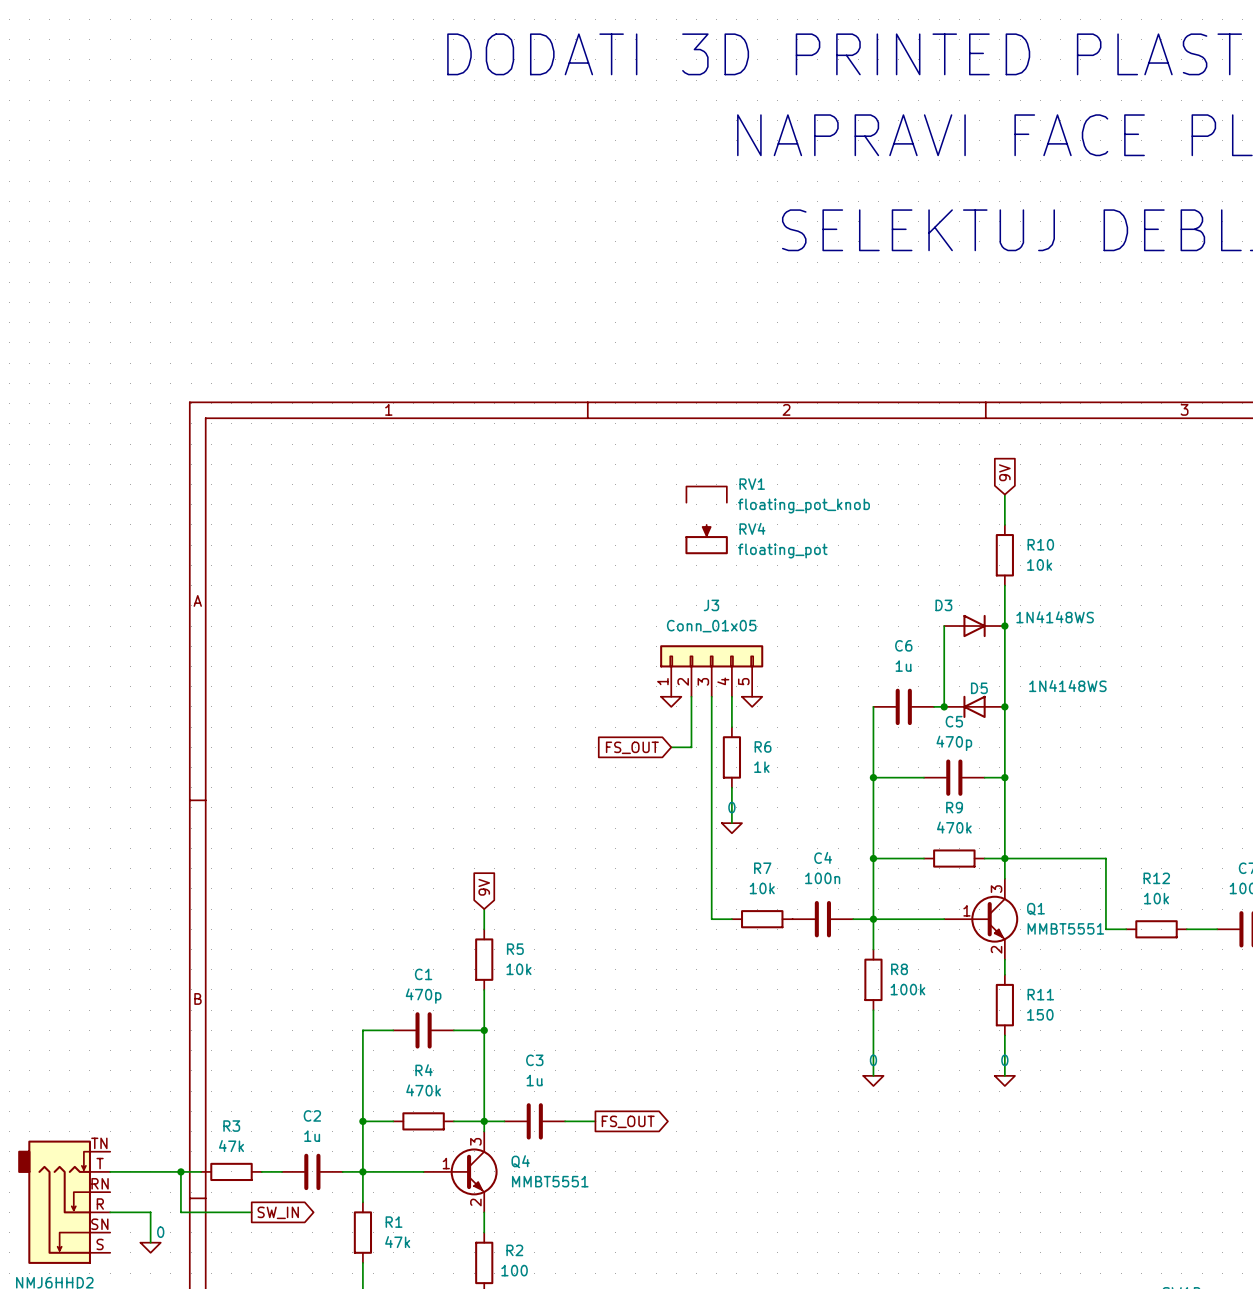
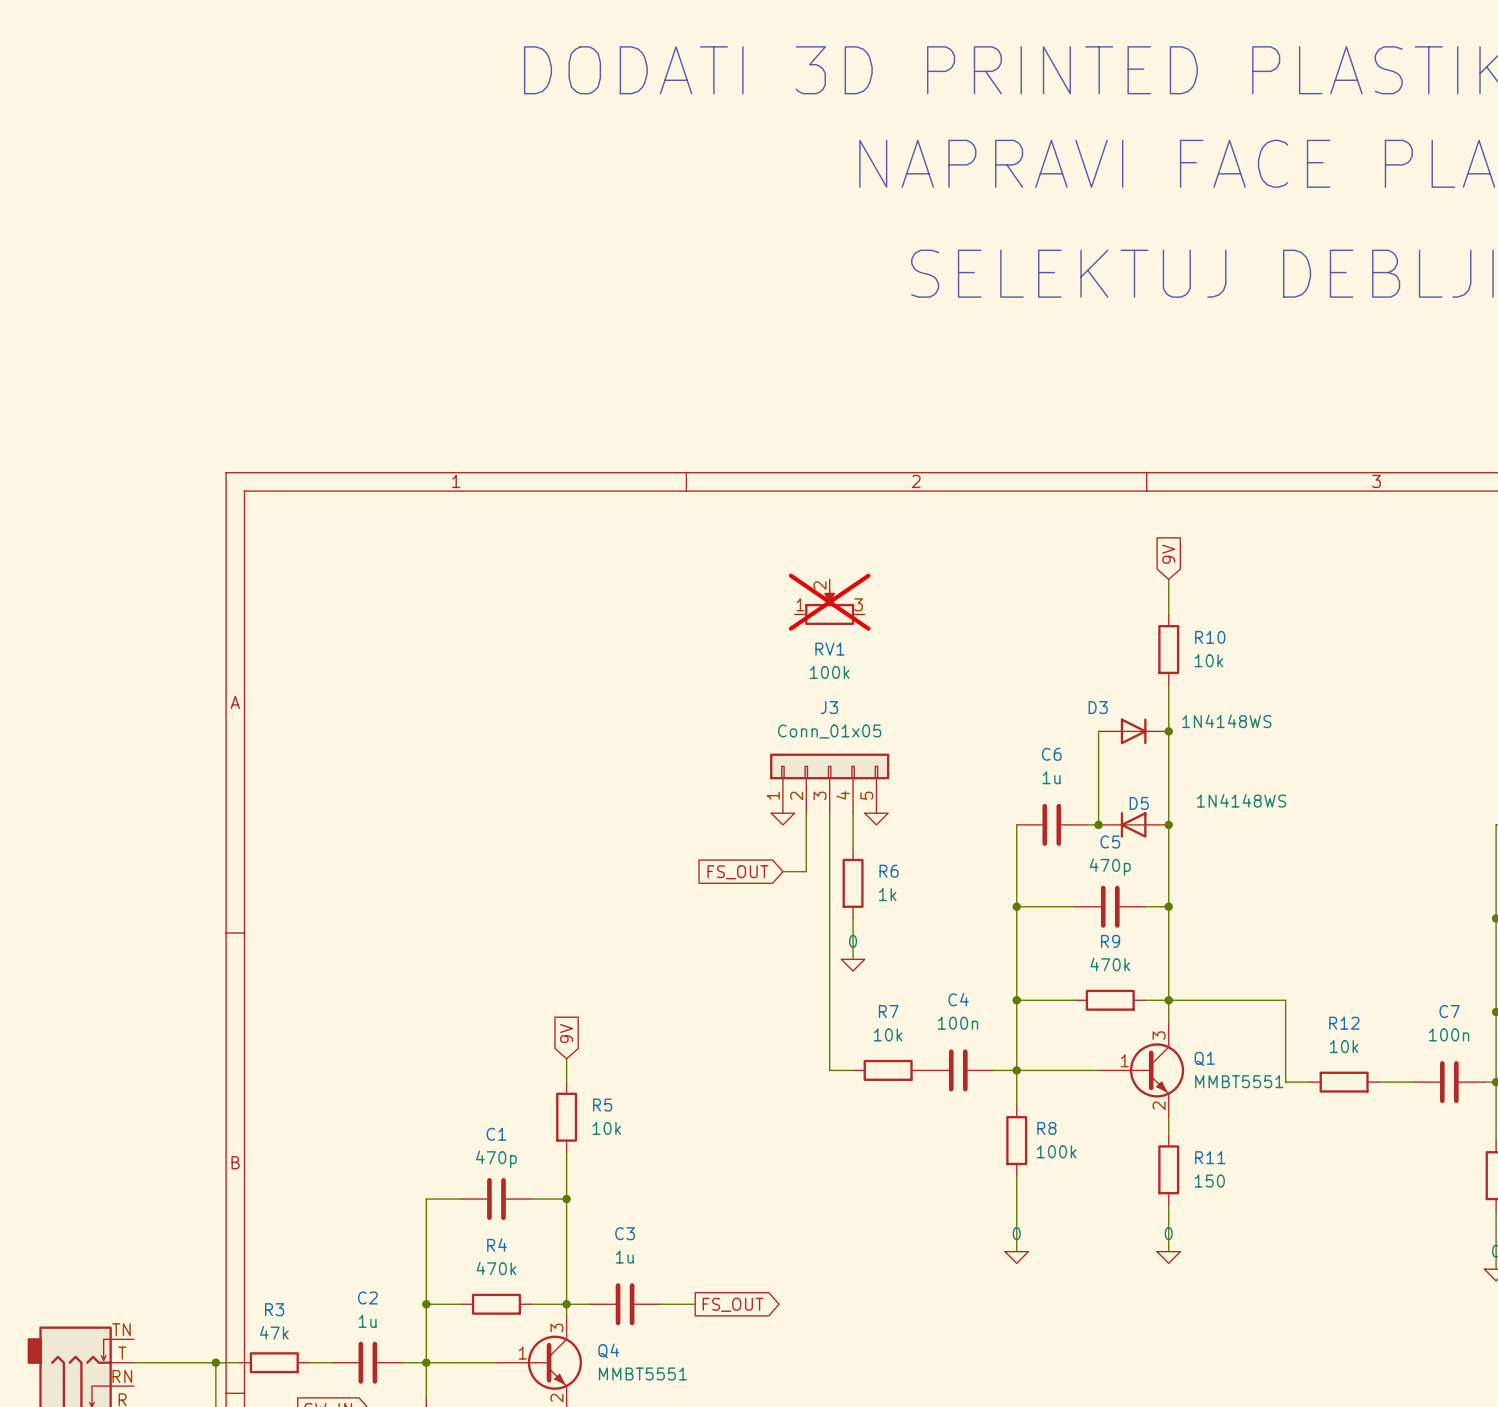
RV1 name position: RV1 (752, 484) -> RV1 (829, 649)
RV1 symbol: [686, 486, 727, 503] -> [794, 579, 865, 625]
RV1 value: floating_pot_knob (803, 506) -> 100k (829, 672)
RV1 do-not-place cross: none -> (829, 602)
RV4: floating_pot (706, 539) -> none

